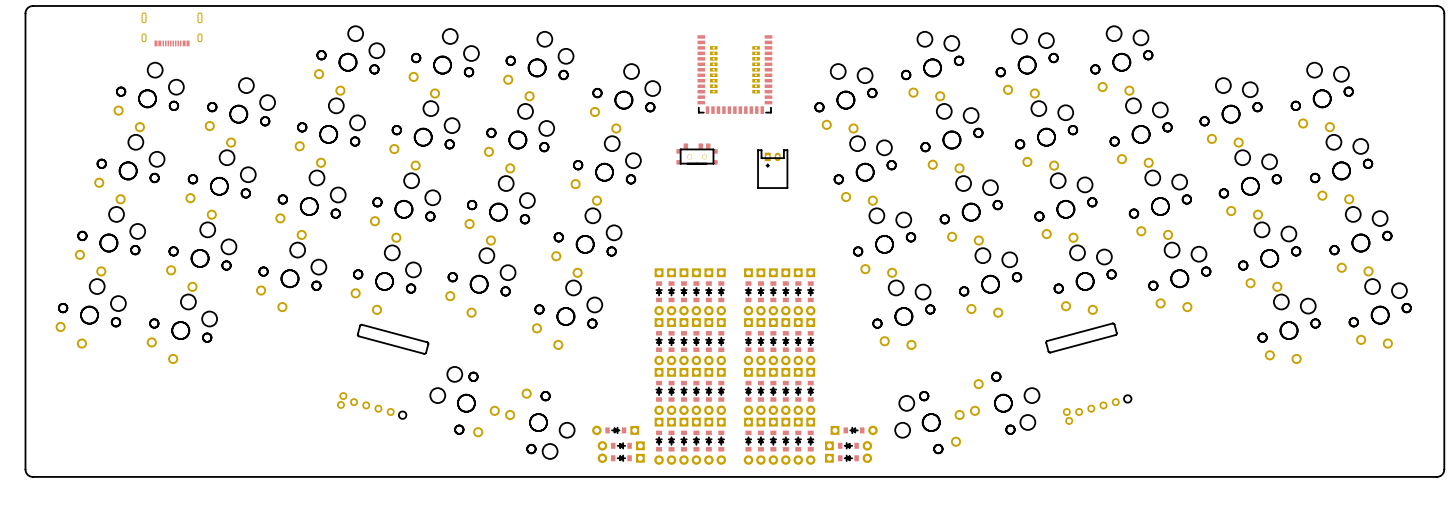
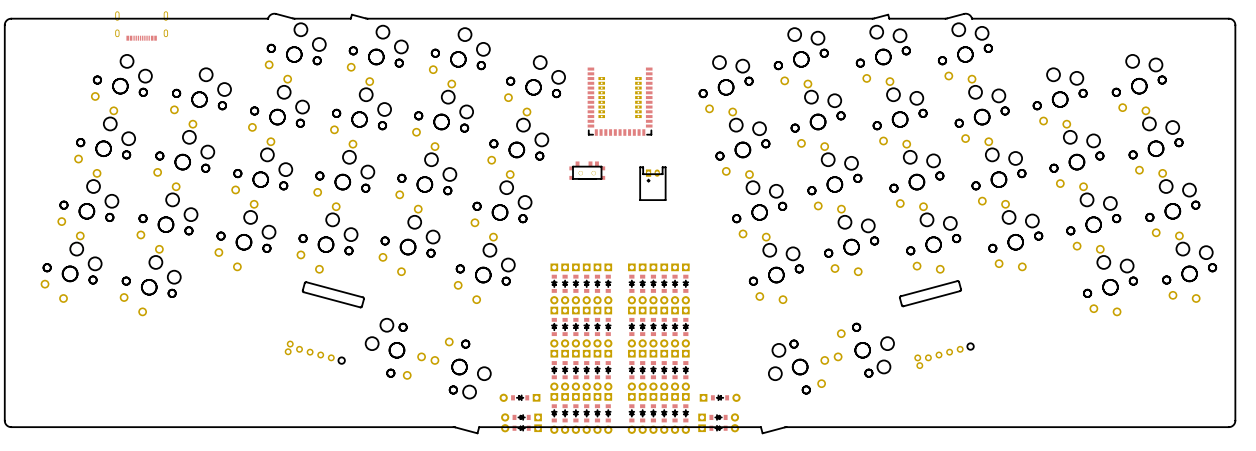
board edge: (32, 5) (1438, 6) (1442, 8) (1444, 13) (1444, 471) (1441, 475) (1436, 476) (31, 476) (27, 474) (25, 469) (25, 13) (27, 8) (32, 5) -> (276, 13) (271, 14) (268, 18) (11, 18) (5, 21) (4, 420) (8, 426) (453, 427) (477, 433) (479, 427) (760, 427) (762, 433) (786, 427) (1228, 427) (1234, 423) (1235, 25) (1231, 19) (972, 18) (965, 13) (945, 18) (889, 18) (888, 14) (872, 18) (367, 18) (351, 14) (350, 18) (294, 18) (276, 13)
part position: (734, 74) -> (620, 101)
part position: (697, 154) -> (587, 170)
part position: (772, 169) -> (652, 183)
part: (659, 291) -> none
part: (671, 291) -> none
part: (683, 291) -> none
part: (696, 291) -> none
part: (708, 291) -> none
part: (721, 291) -> none
part: (748, 291) -> none
part: (760, 291) -> none
part: (773, 291) -> none
part: (785, 291) -> none
part: (798, 291) -> none
part: (810, 291) -> none
part: none -> (554, 283)
part: none -> (565, 283)
part: none -> (575, 283)
part: none -> (586, 283)
part: none -> (597, 283)
part: none -> (608, 283)
part: none -> (631, 283)
part: none -> (642, 283)
part: none -> (653, 283)
part: none -> (664, 283)
part: none -> (675, 283)
part: none -> (685, 283)
part: (659, 341) -> none
part: (671, 341) -> none
part: (683, 341) -> none
part: (696, 341) -> none
part: (708, 341) -> none
part: (721, 341) -> none
part: (748, 341) -> none
part: (760, 341) -> none
part: (773, 341) -> none
part: (785, 341) -> none
part: (798, 341) -> none
part: (810, 341) -> none
part: none -> (554, 327)
part: none -> (565, 327)
part: none -> (575, 327)
part: none -> (586, 327)
part: none -> (597, 327)
part: none -> (608, 327)
part: none -> (631, 327)
part: none -> (642, 327)
part: none -> (653, 327)
part: none -> (664, 327)
part: none -> (675, 327)
part: none -> (685, 327)
part: (659, 391) -> none
part: (671, 391) -> none
part: (683, 391) -> none
part: (696, 391) -> none
part: (708, 391) -> none
part: (721, 391) -> none
part: (748, 391) -> none
part: (760, 391) -> none
part: (773, 391) -> none
part: (785, 391) -> none
part: (798, 391) -> none
part: (810, 391) -> none
part: none -> (554, 370)
part: none -> (565, 370)
part: none -> (575, 370)
part: none -> (586, 370)
part: none -> (597, 370)
part: none -> (608, 370)
part: none -> (631, 370)
part: none -> (642, 370)
part: none -> (653, 370)
part: none -> (664, 370)
part: none -> (675, 370)
part: none -> (685, 370)
part: (615, 430) -> none
part: (854, 430) -> none
part: (659, 441) -> none
part: (671, 441) -> none
part: (683, 441) -> none
part: (696, 441) -> none
part: (708, 441) -> none
part: (721, 441) -> none
part: (748, 441) -> none
part: (760, 441) -> none
part: (773, 441) -> none
part: (785, 441) -> none
part: (798, 441) -> none
part: (810, 441) -> none
part: (621, 445) -> none
part: (848, 445) -> none
part: none -> (519, 397)
part: (621, 458) -> none
part: none -> (720, 397)
part: (848, 458) -> none
part: none -> (554, 413)
part: none -> (565, 413)
part: none -> (575, 413)
part: none -> (586, 413)
part: none -> (597, 413)
part: none -> (608, 413)
part: none -> (631, 413)
part: none -> (642, 413)
part: none -> (653, 413)
part: none -> (664, 413)
part: none -> (675, 413)
part: none -> (685, 413)
part: none -> (521, 417)
part: none -> (718, 417)
part: none -> (521, 428)
part: none -> (718, 428)

